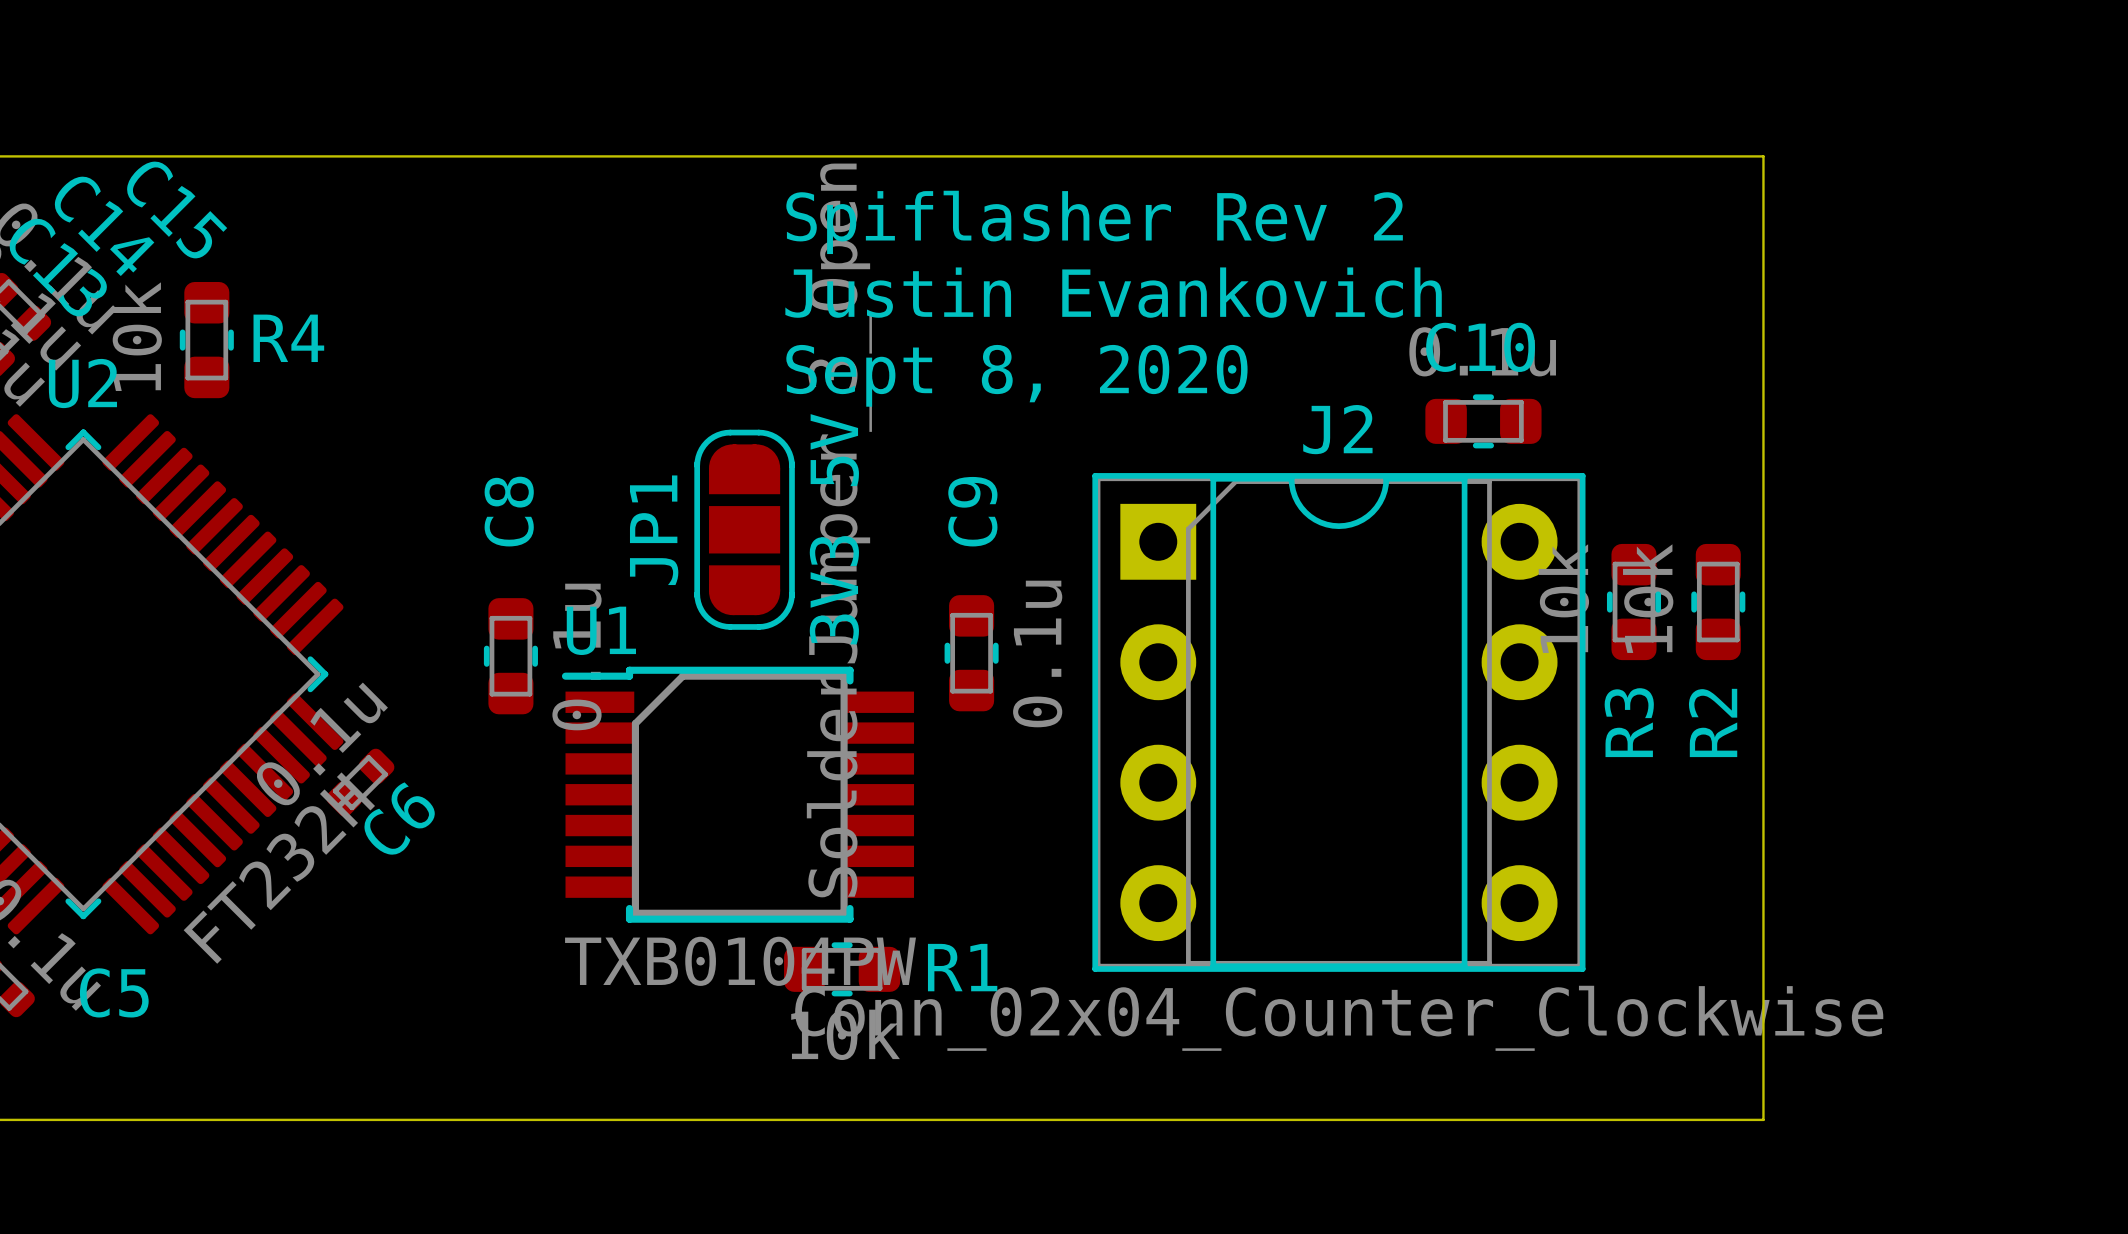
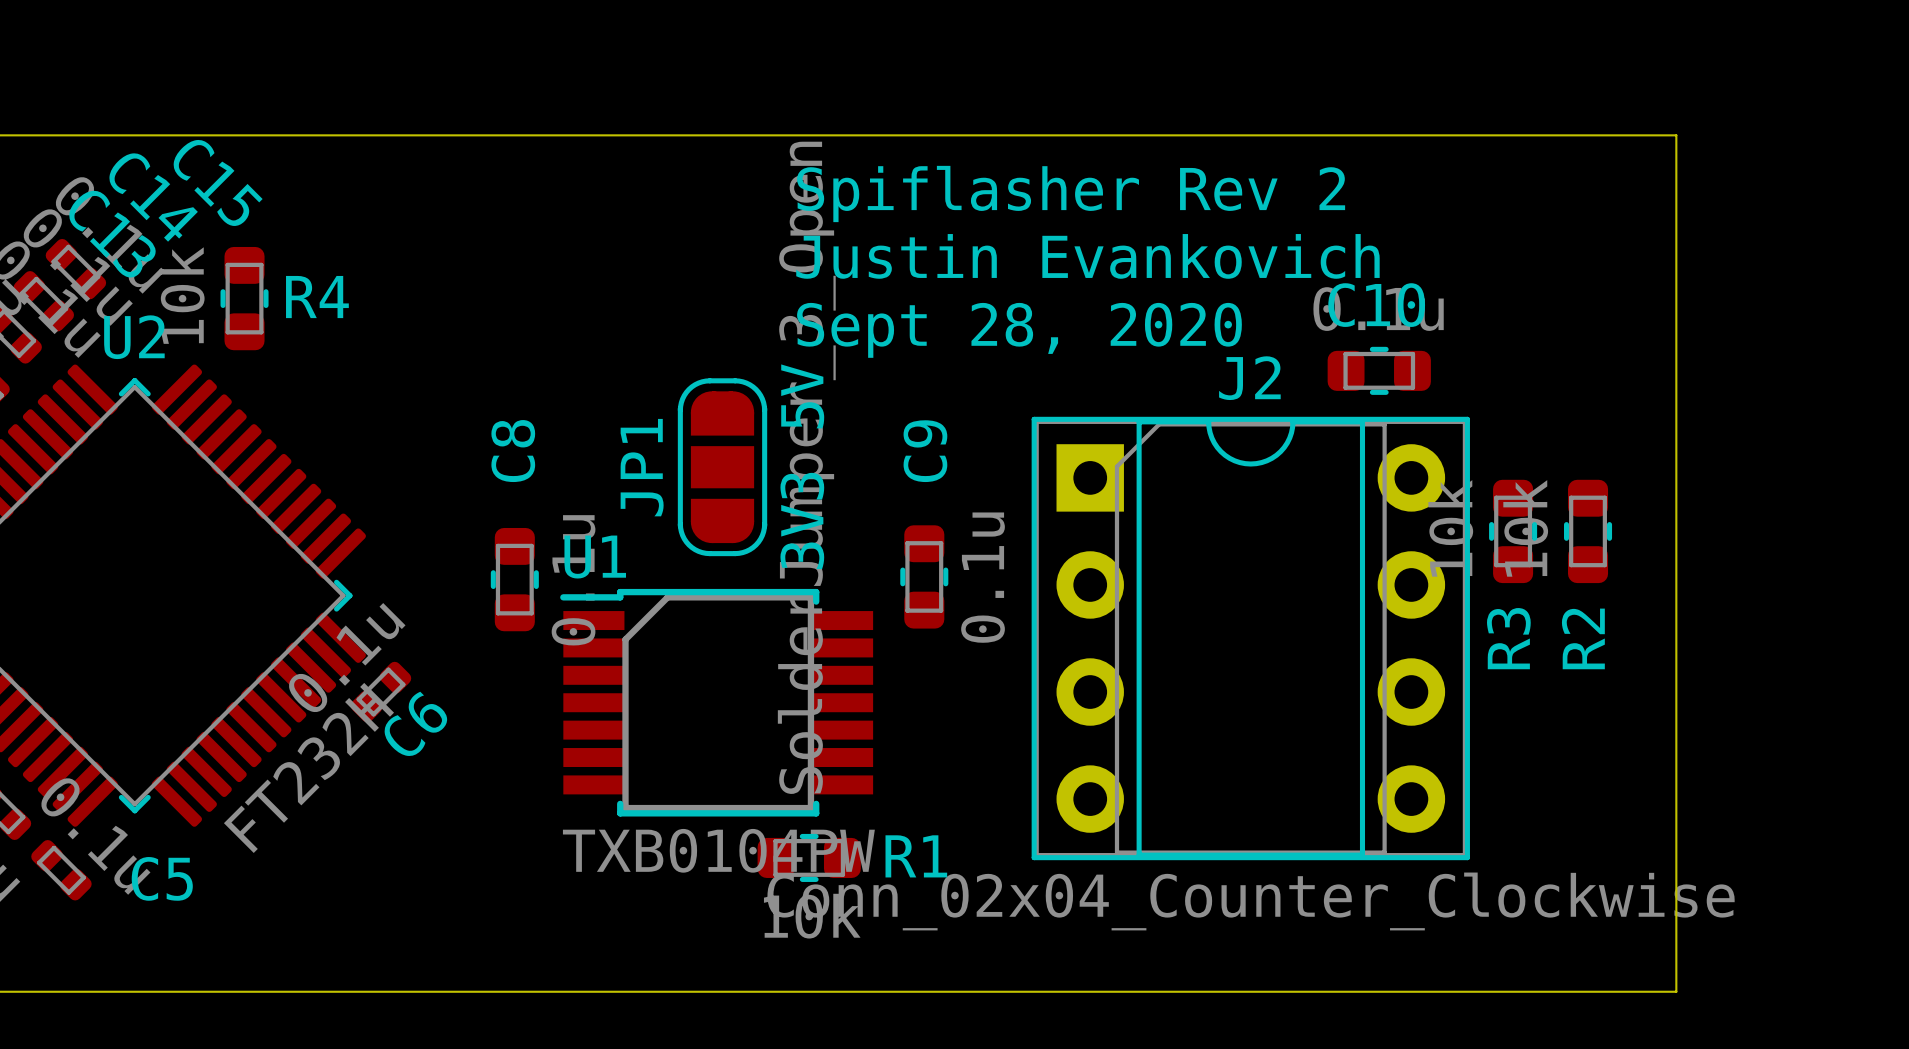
board edge: (1763, 156) (1763, 1119) -> (1628, 135) (1676, 135) (1676, 991) (1628, 991)
text position: Spiflasher Rev 2 (1094, 222) -> Spiflasher Rev 2 (1071, 193)
text position: Justin Evankovich (1113, 292) -> Justin Evankovich (1087, 256)
text: Sept 8, 2020 (1016, 375) -> Sept 28, 2020 (1019, 330)

